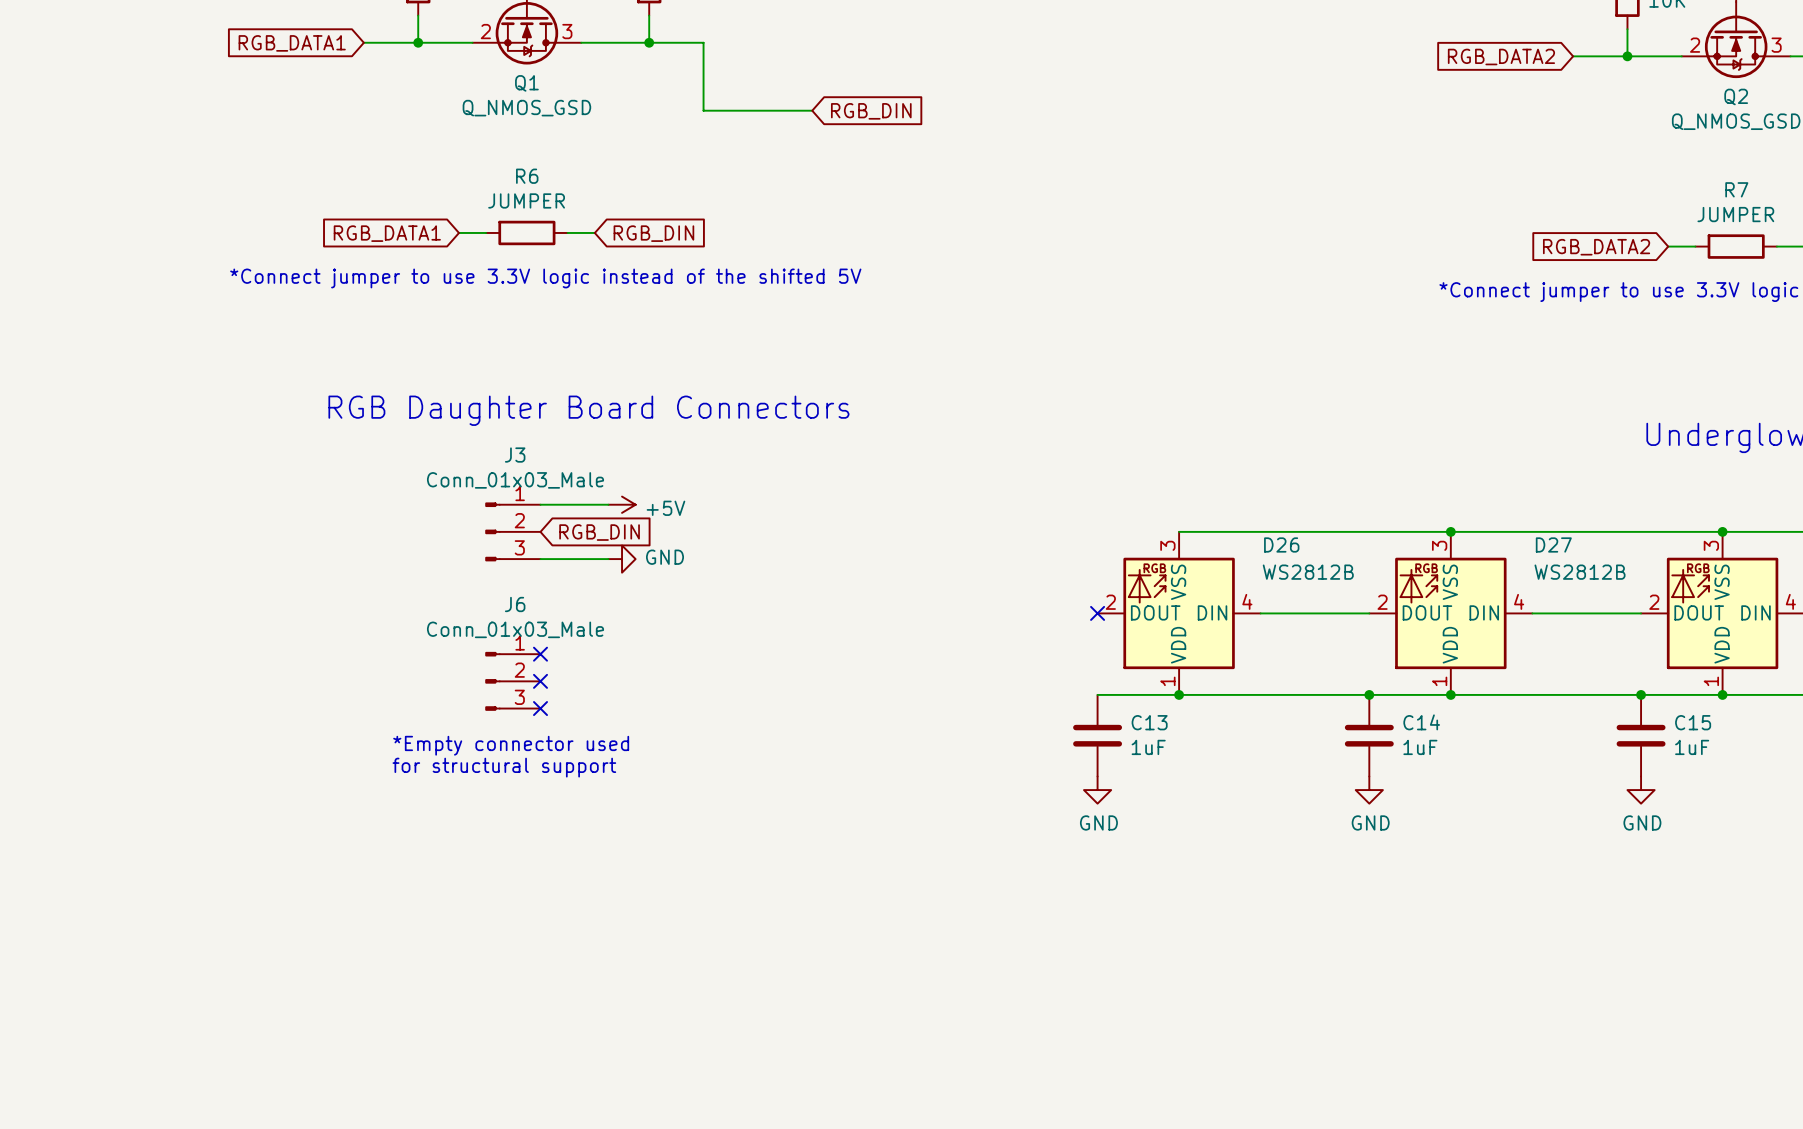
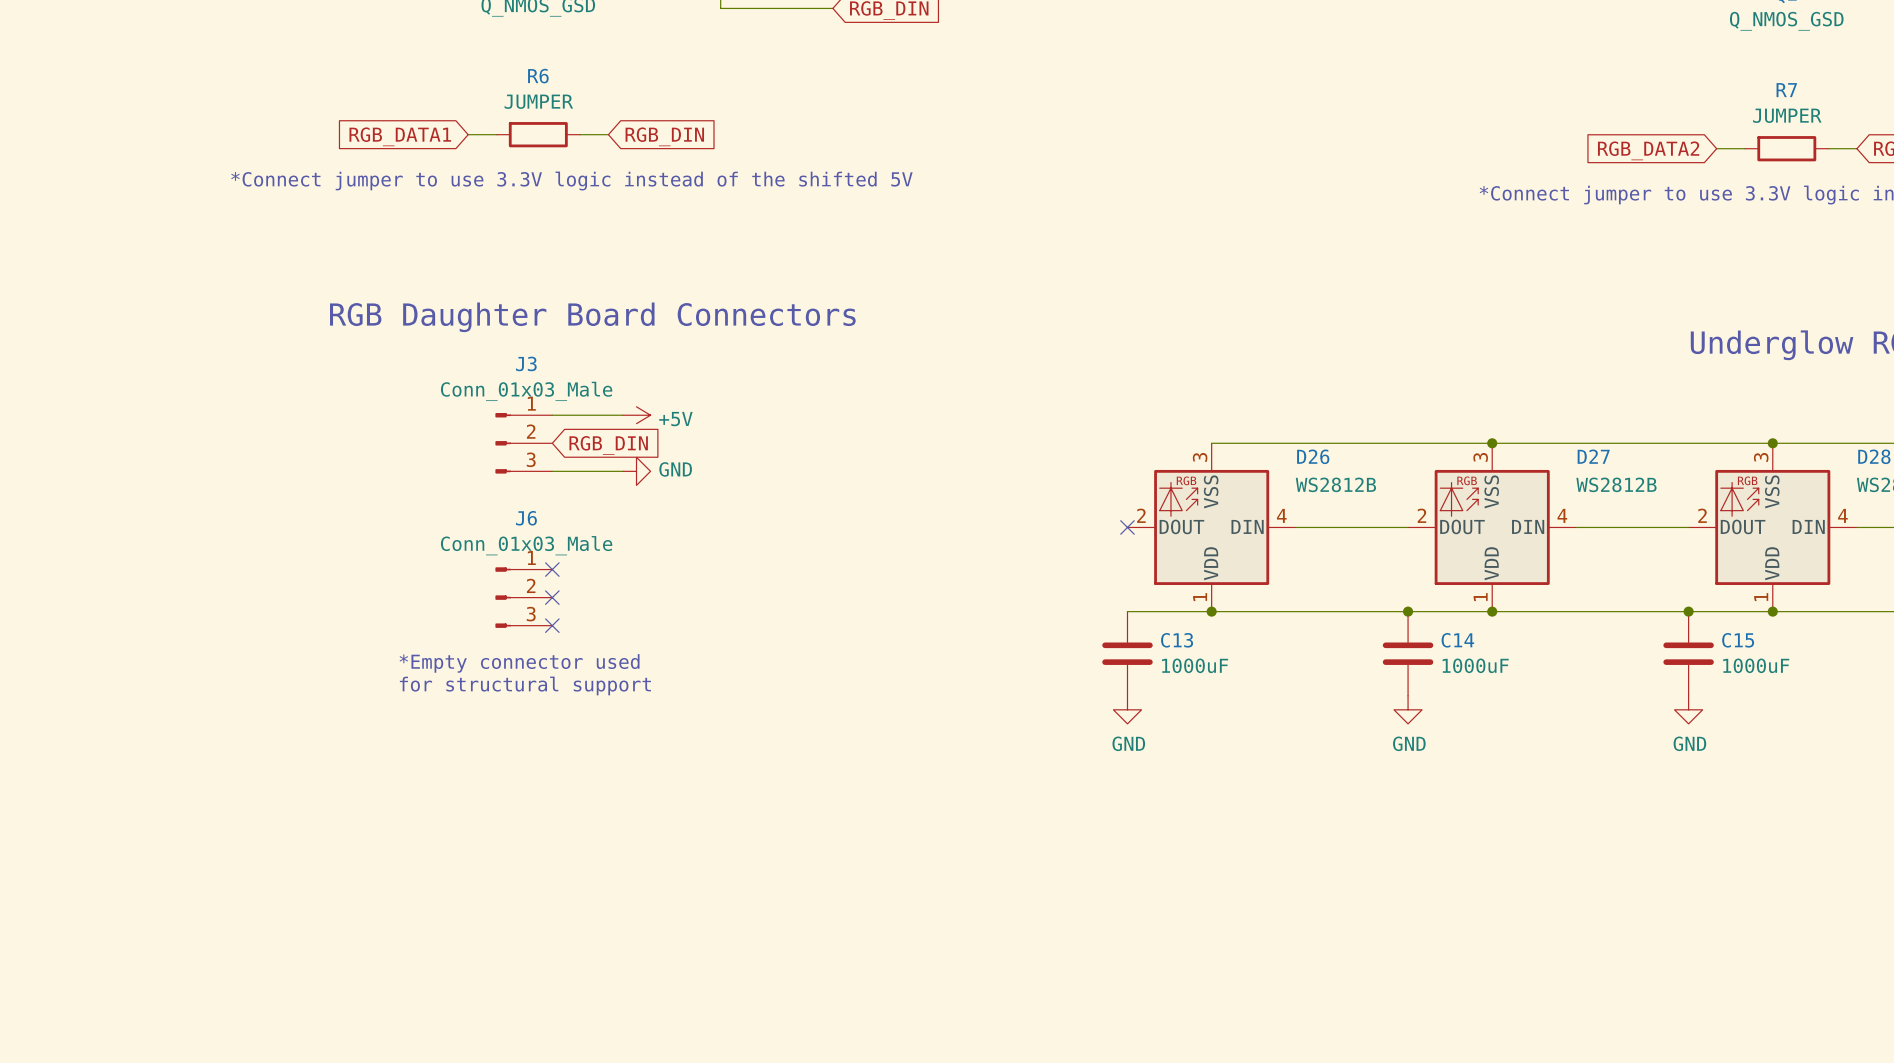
C13 value: 1uF (1148, 747) -> 1000uF (1195, 665)
C14 value: 1uF (1420, 747) -> 1000uF (1475, 665)
C15 value: 1uF (1692, 747) -> 1000uF (1756, 665)

